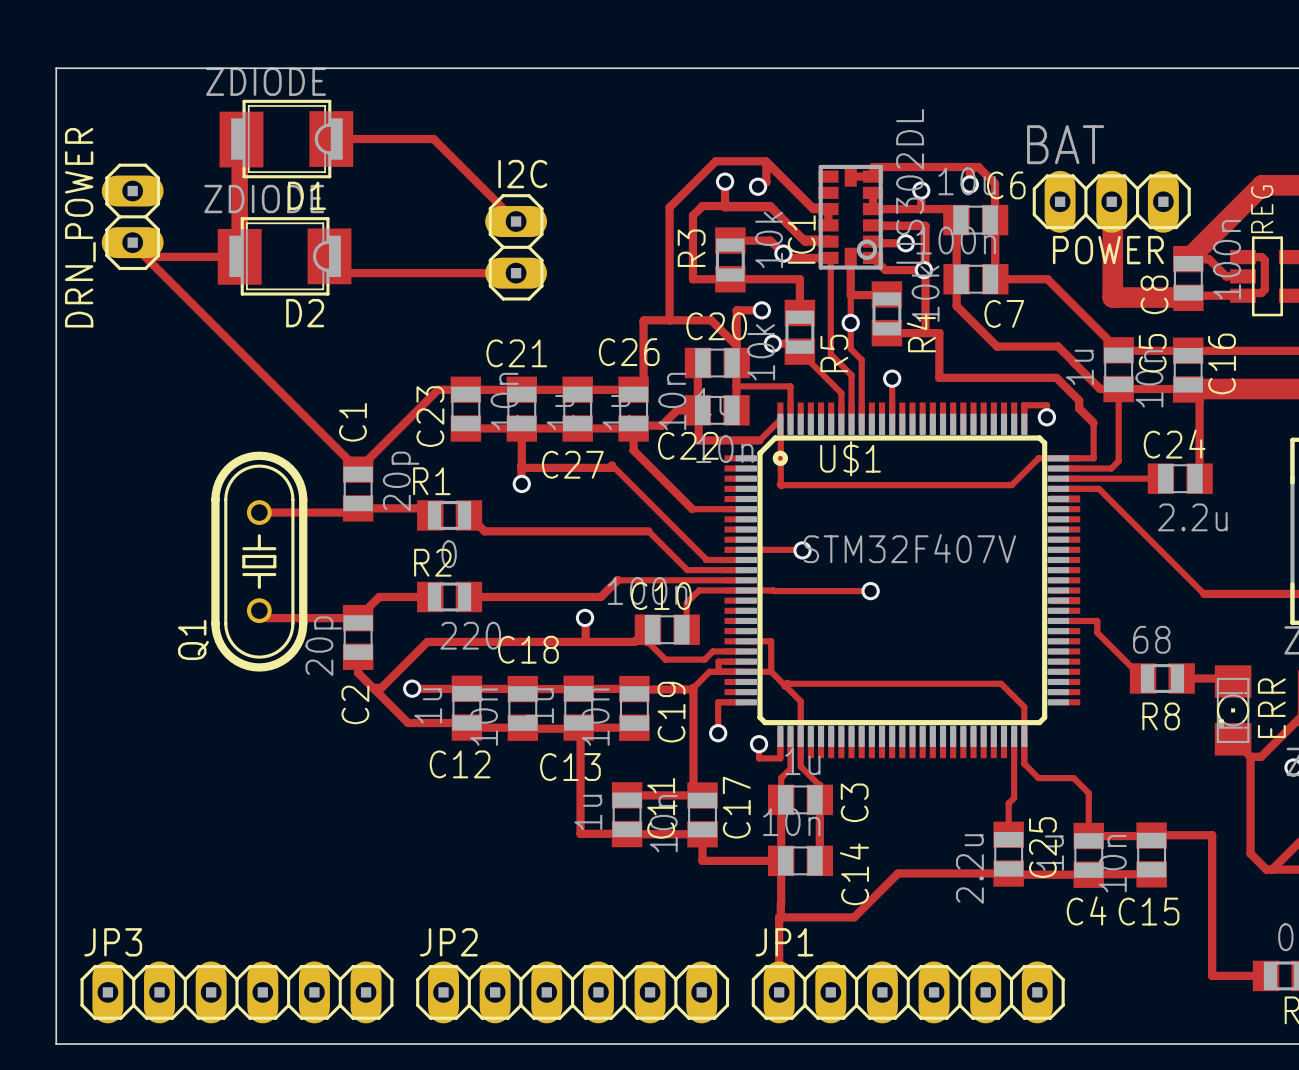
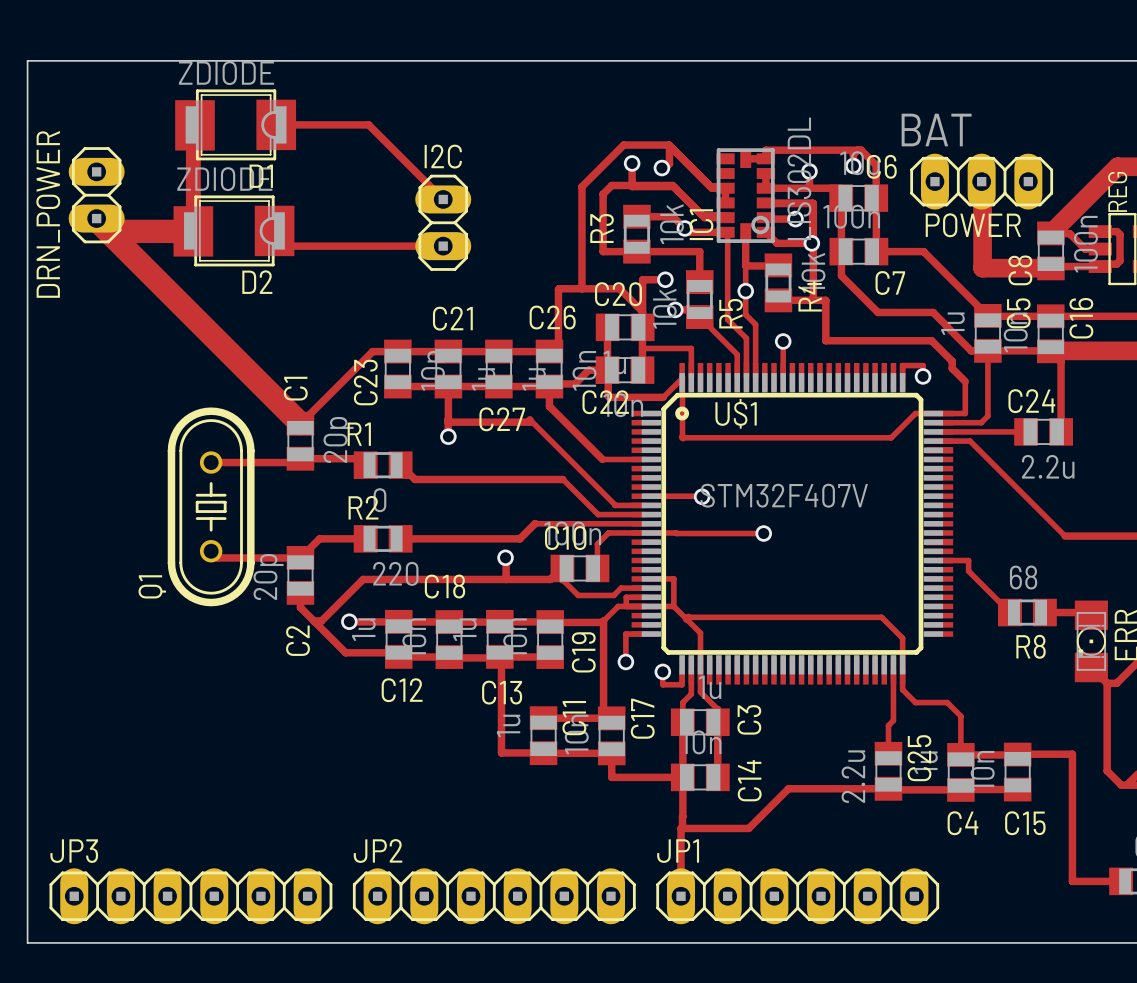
track width: thin (132, 244) (358, 469) -> thick (96, 220) (300, 423)
track width: thin (146, 256) (239, 256) -> thick (109, 231) (193, 231)

